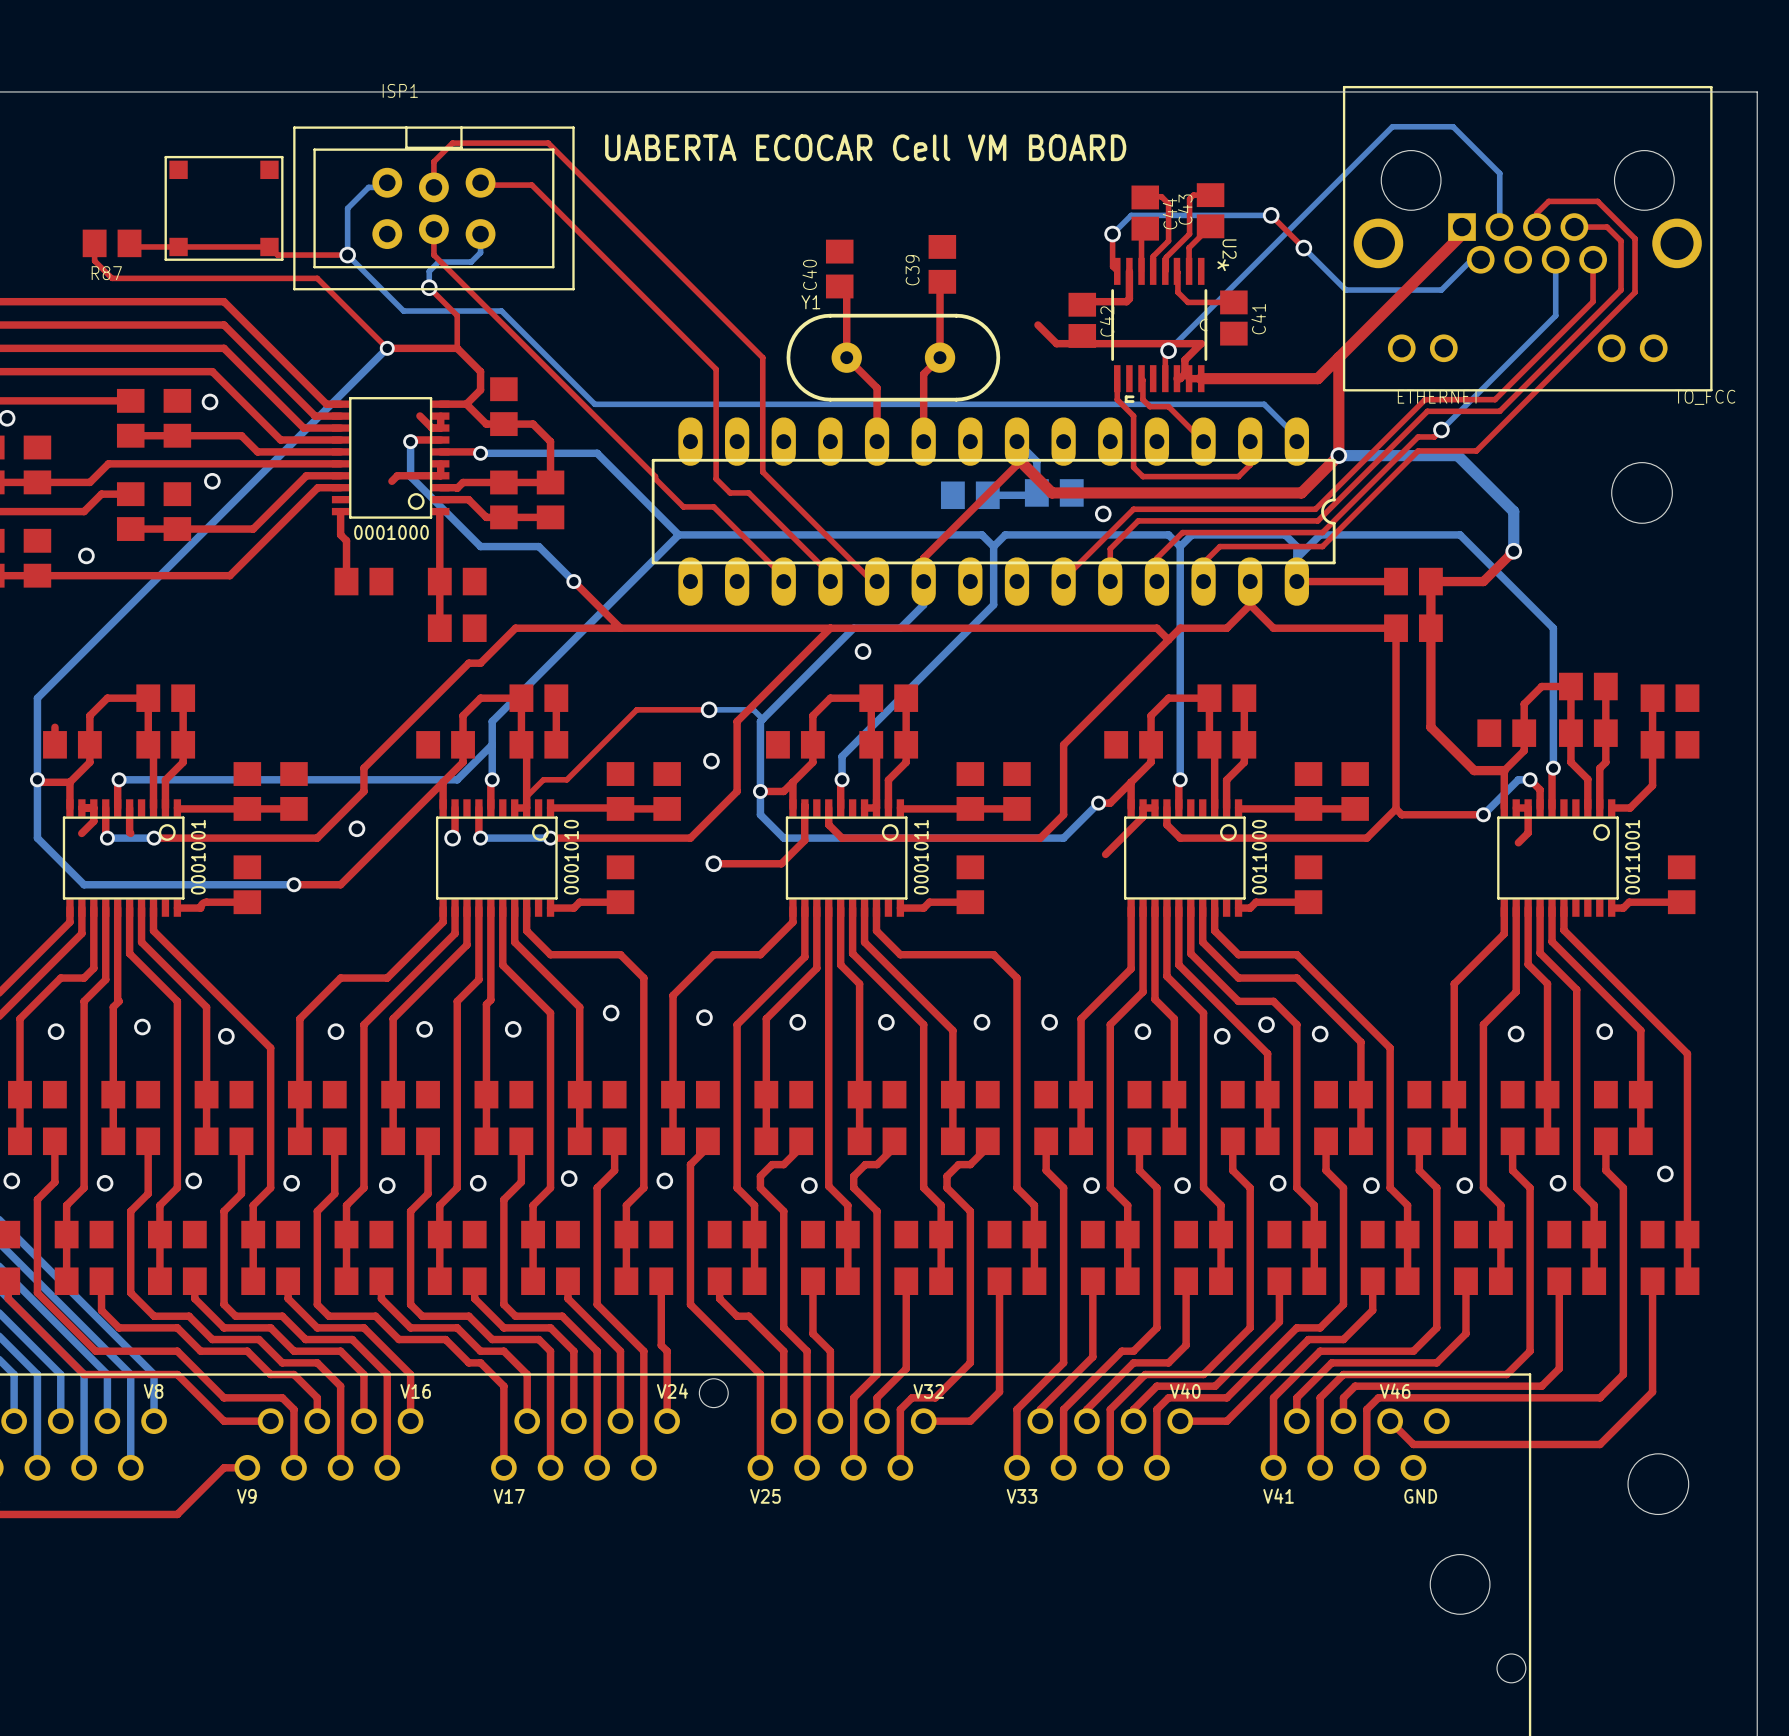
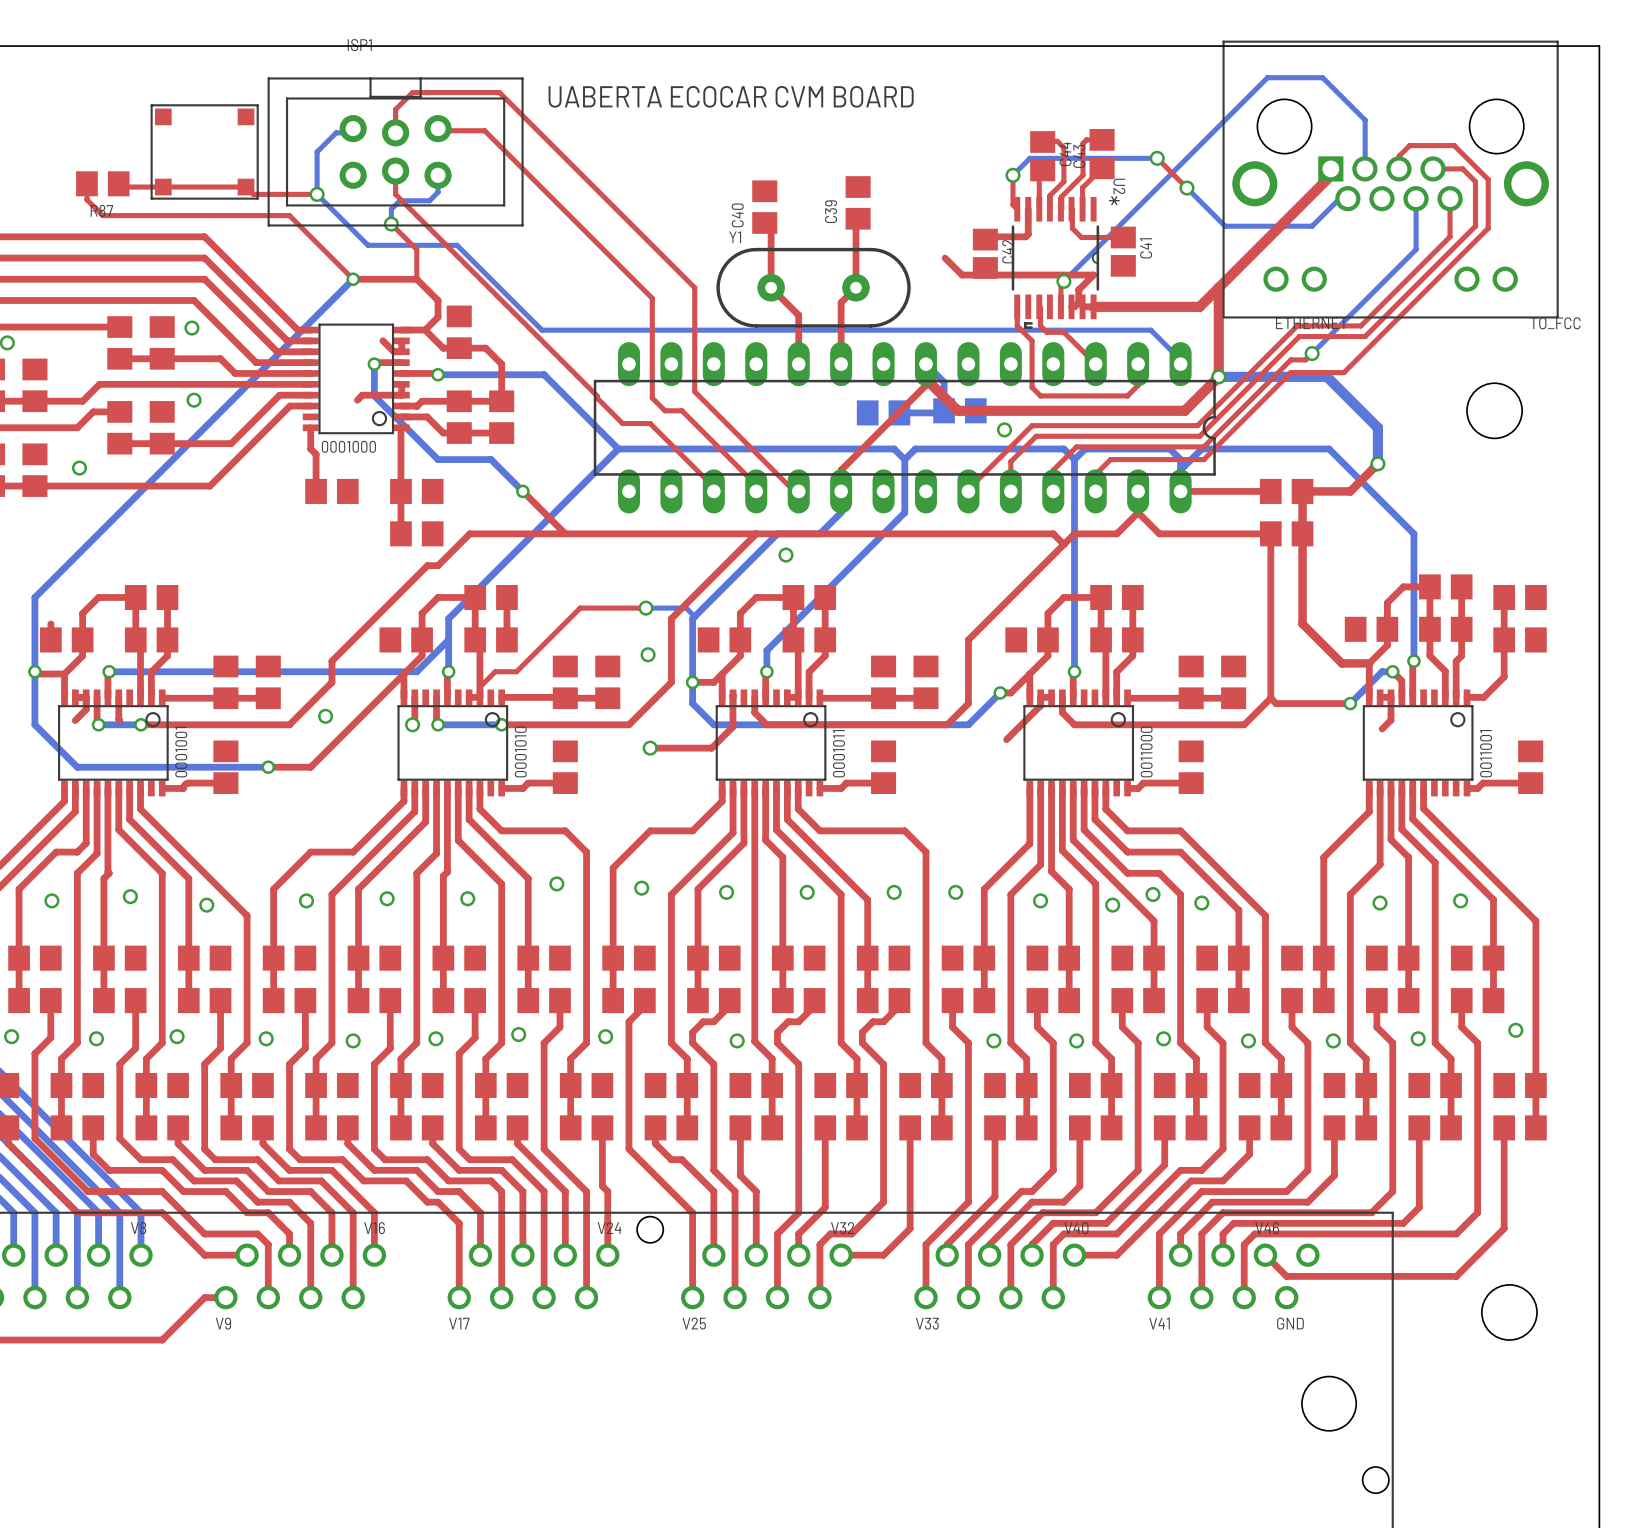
text: UABERTA ECOCAR Cell VM BOARD (865, 147) -> UABERTA ECOCAR CVM BOARD (731, 96)

